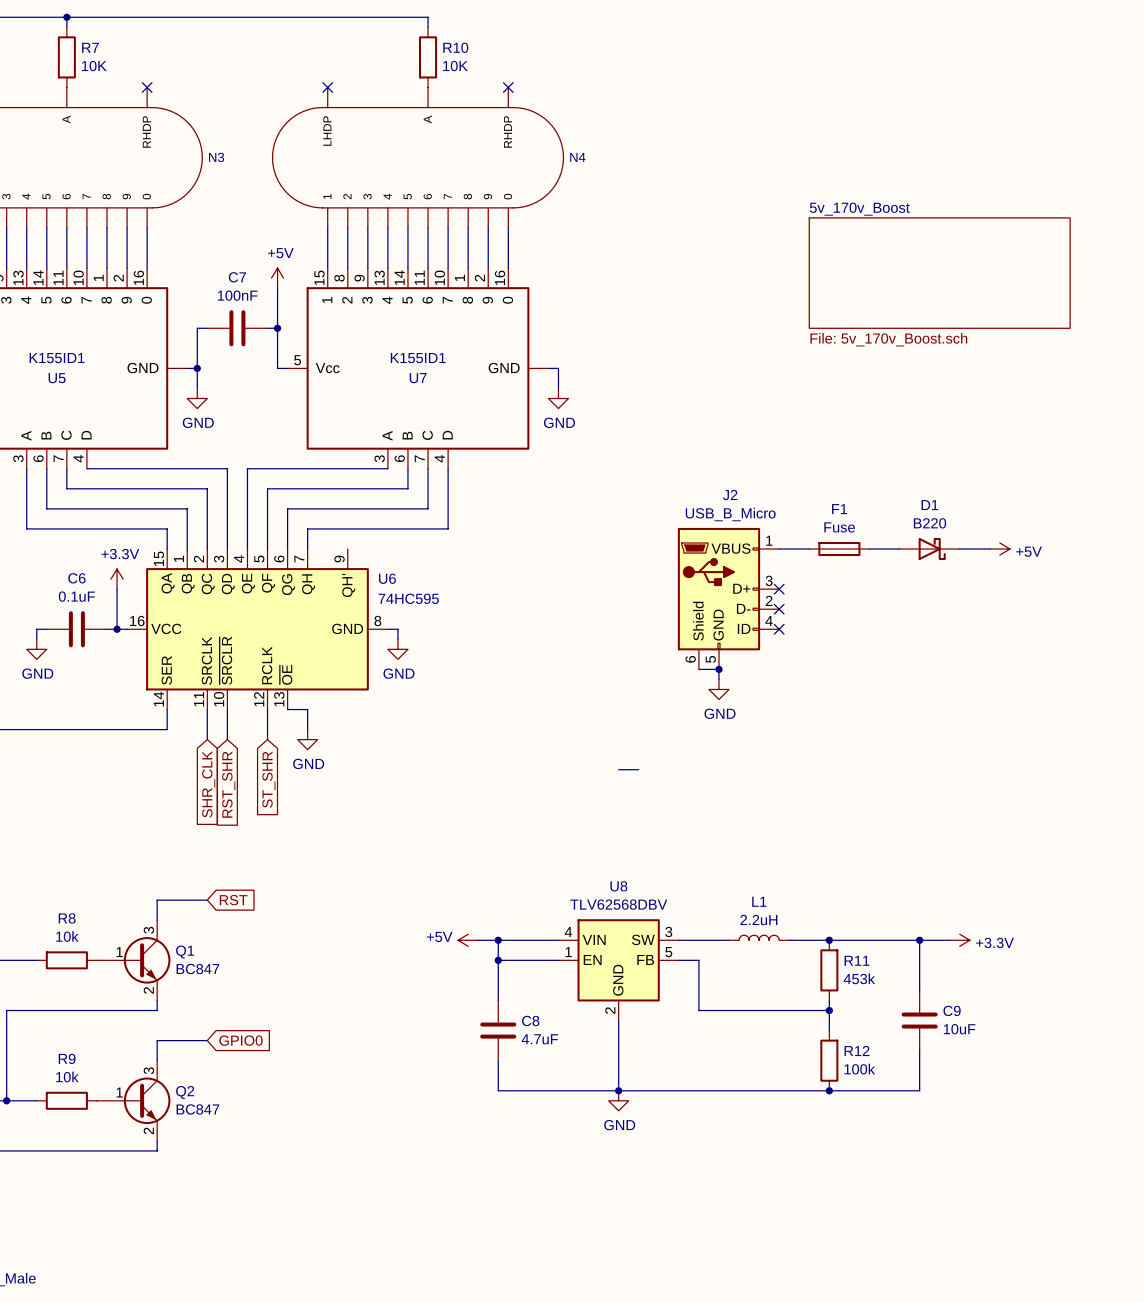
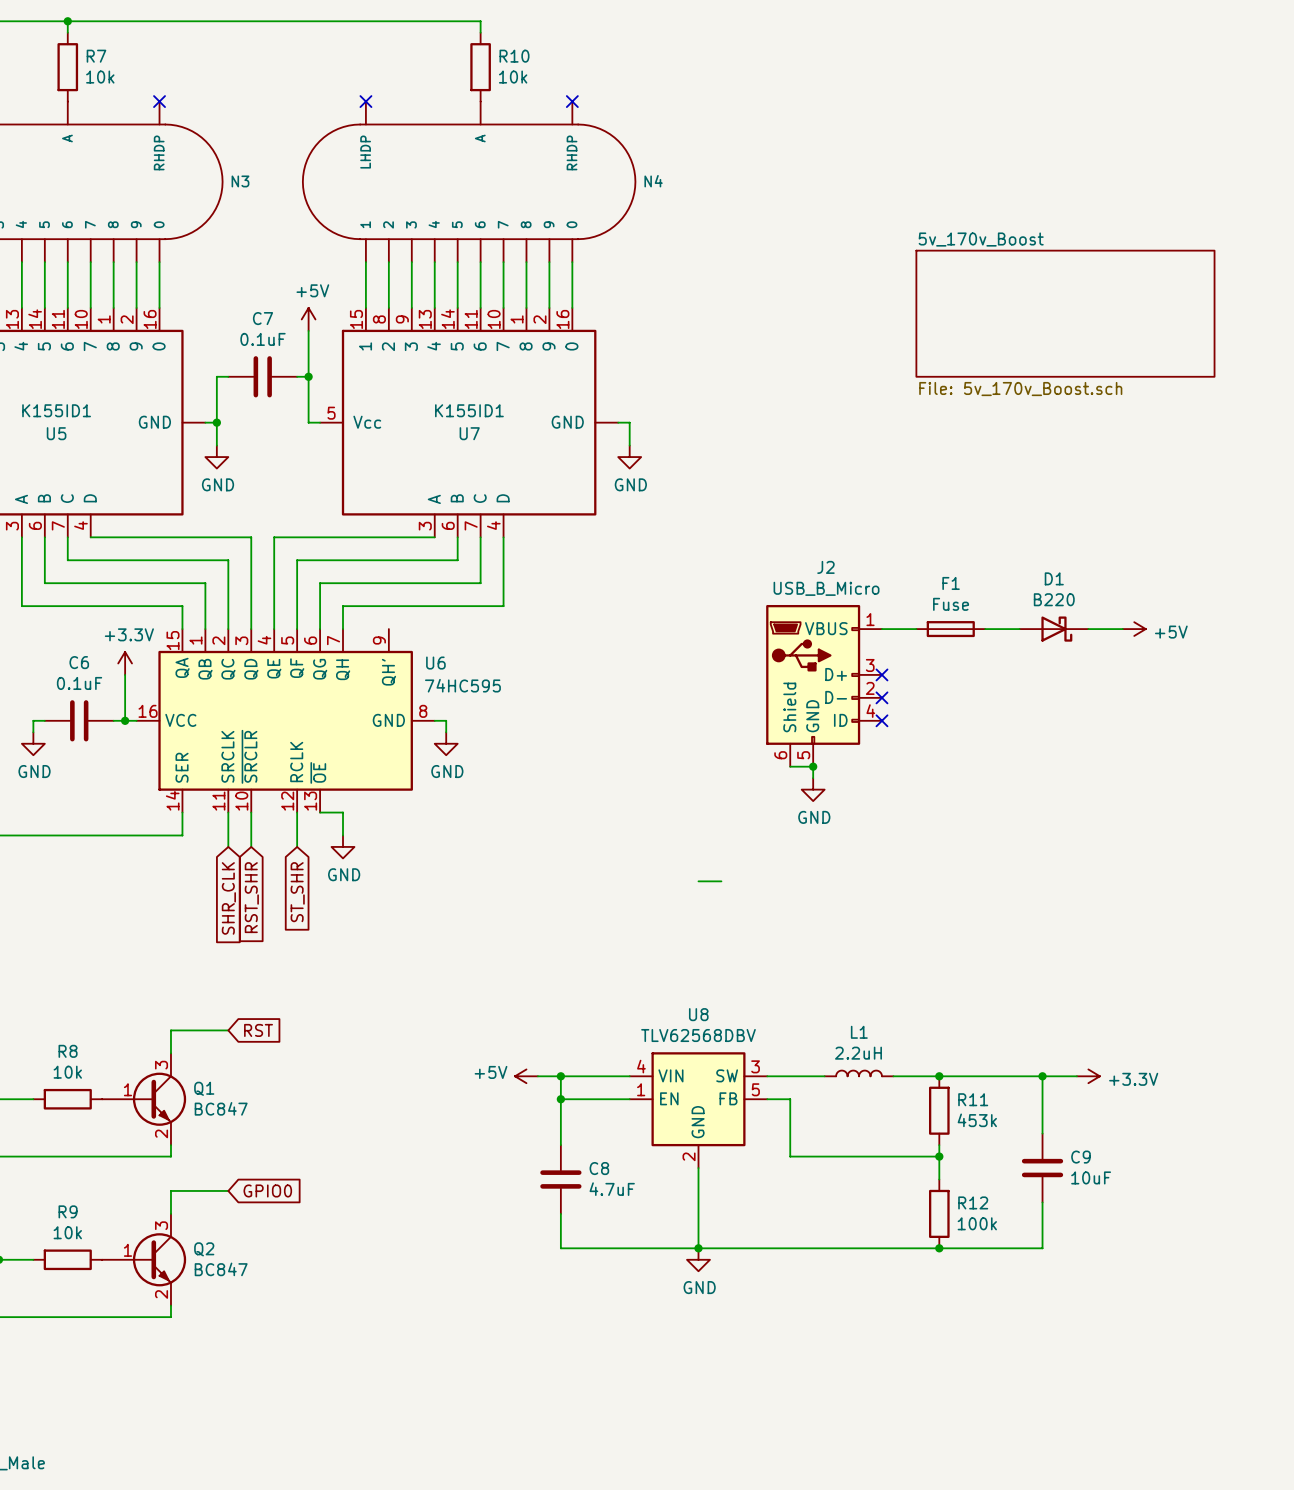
R7 value: 10K (94, 66) -> 10k (100, 77)
R10 value: 10K (455, 66) -> 10k (513, 77)
C7 value: 100nF (237, 295) -> 0.1uF (263, 339)

